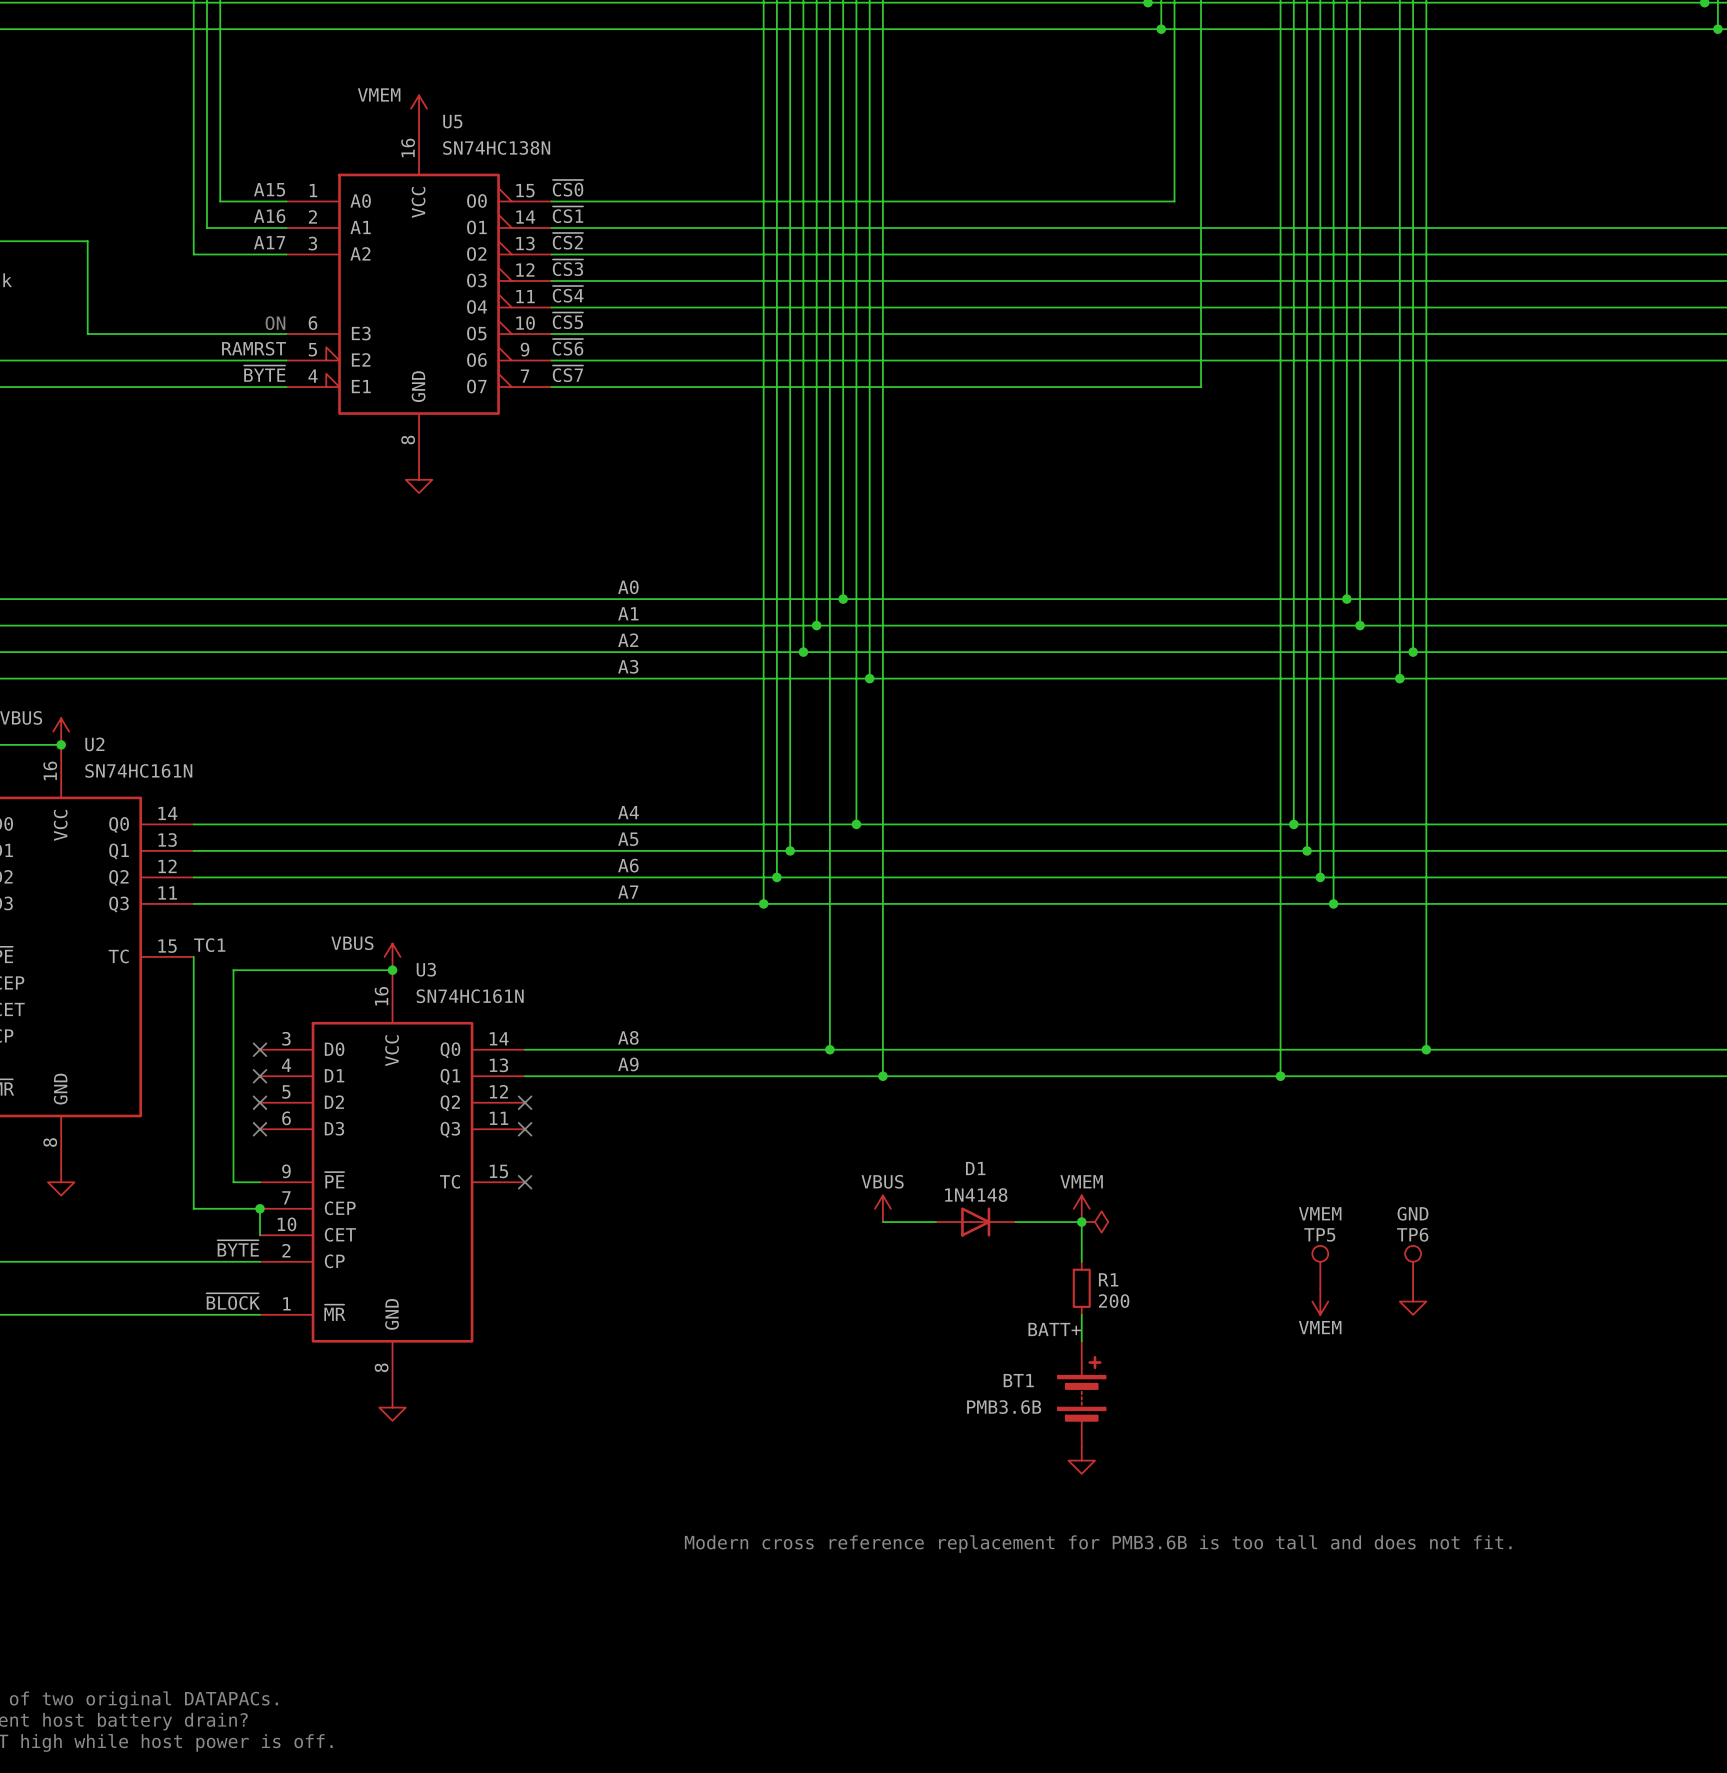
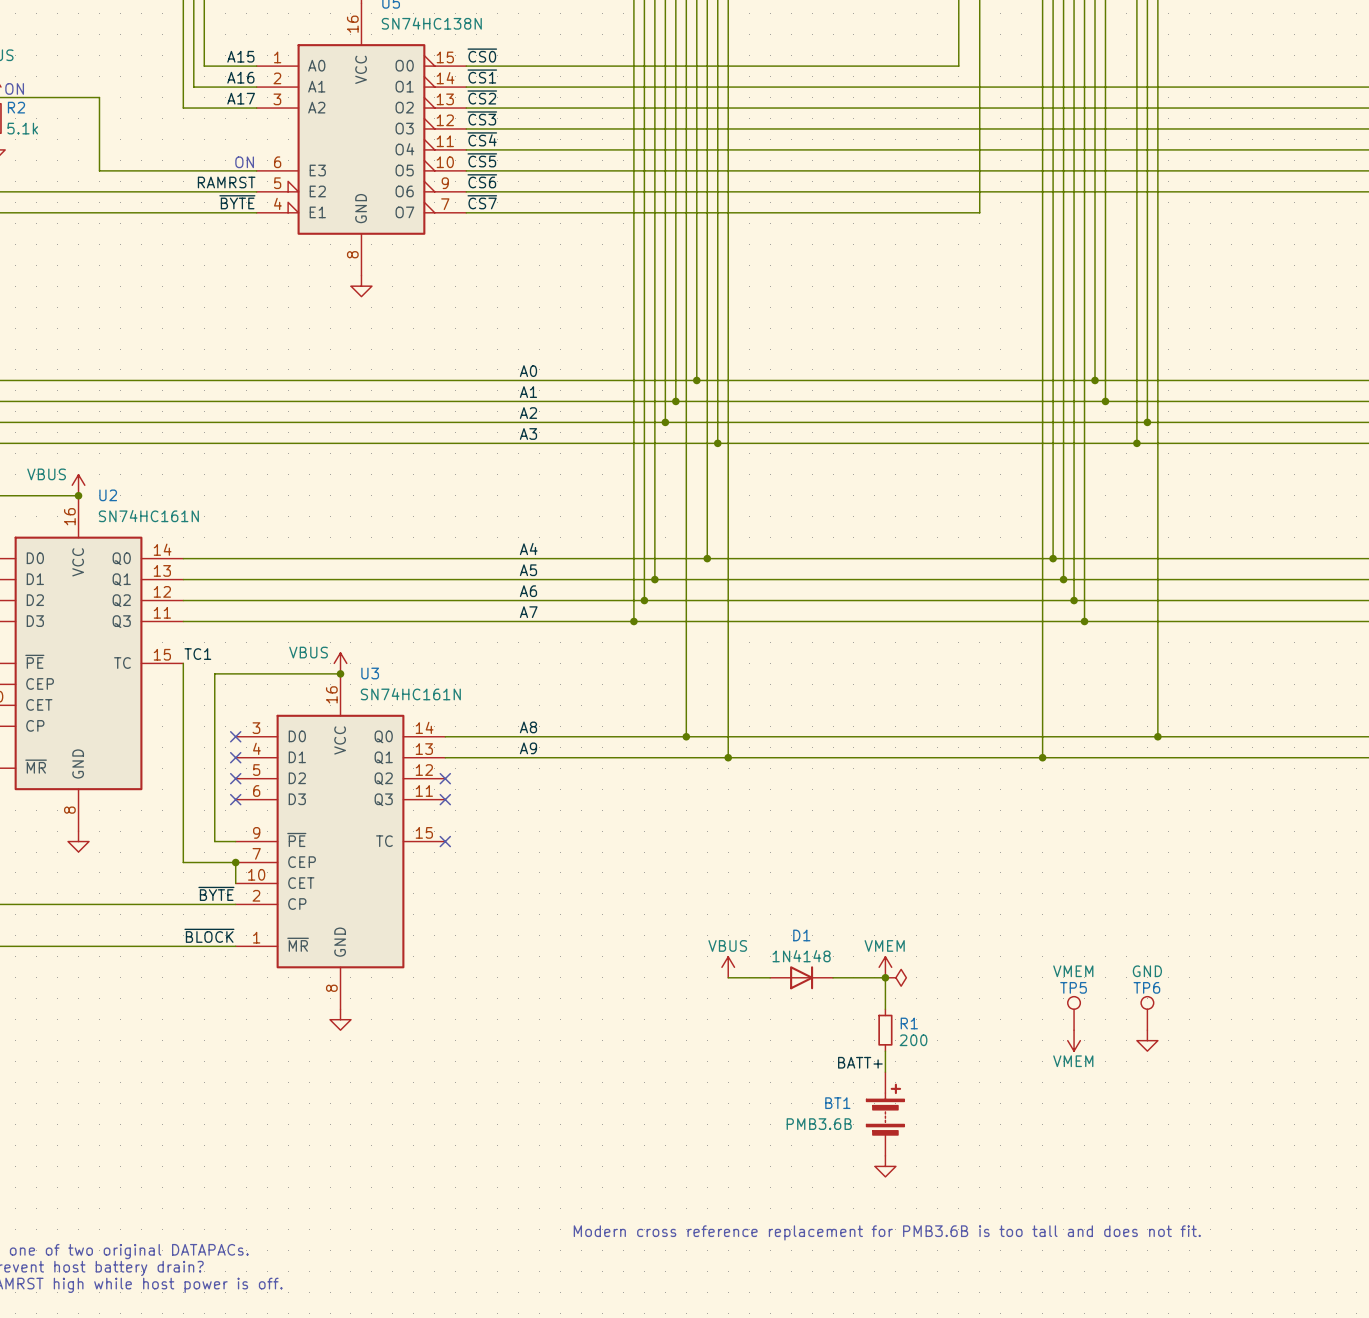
power symbol position: VBUS (882, 1208) -> VBUS (728, 967)
power symbol: VMEM (1081, 1208) -> none
wire: (882, 1222) (935, 1222) -> (728, 977) (770, 977)
D1 position: (975, 1222) -> (801, 977)
wire: (1015, 1222) (1081, 1222) (1081, 1261) -> (833, 977) (885, 977) (885, 1009)
junction: (1081, 1222) -> none
power symbol position: (1094, 1222) -> (895, 977)
TP5 position: (1320, 1267) -> (1074, 1013)
TP6 position: (1413, 1267) -> (1147, 1013)
R1 position: (1081, 1288) -> (885, 1030)
power symbol: VMEM (1320, 1301) -> none
power symbol position: (1413, 1301) -> (1147, 1040)
label position: BATT+ (1054, 1329) -> BATT+ (860, 1062)
power symbol: none -> VMEM (885, 967)
junction: none -> (885, 977)
BT1 position: (1081, 1394) -> (885, 1114)
power symbol: none -> VMEM (1074, 1040)
power symbol position: (1081, 1460) -> (885, 1166)
text position: Modern cross reference replacement for PMB3.6B is too tall and does not fit. (1098, 1544) -> Modern cross reference replacement for PMB3.6B is too tall and does not fit. (887, 1232)

